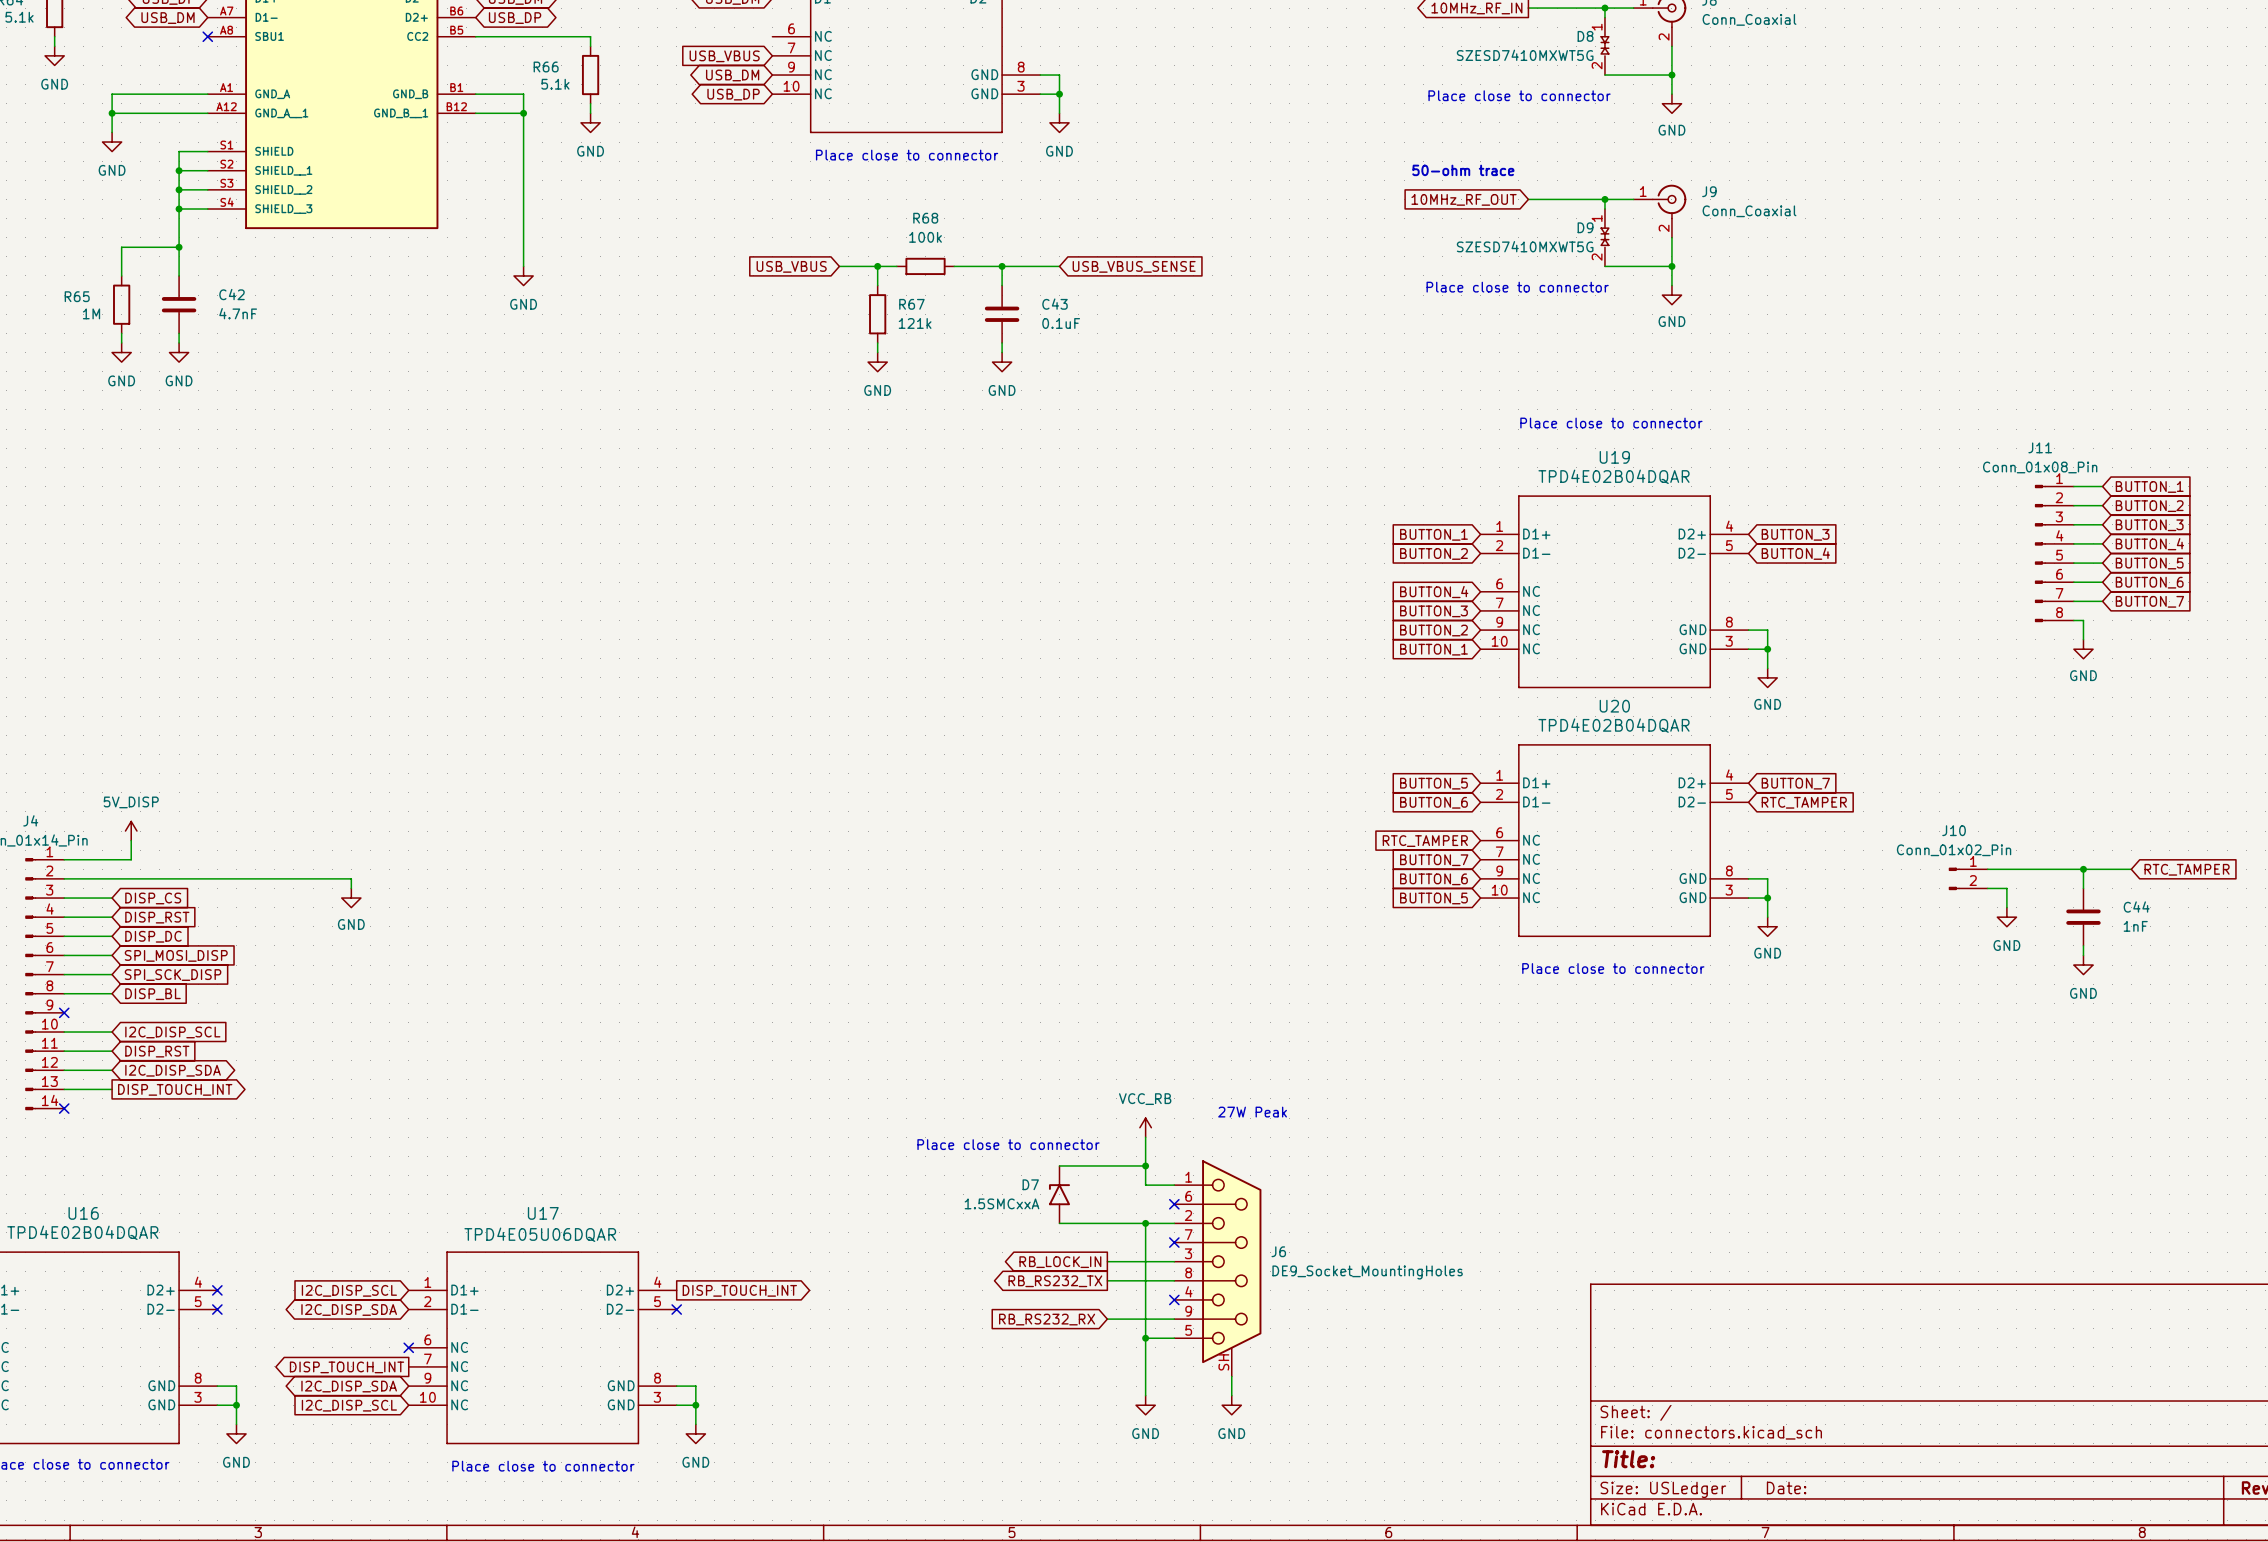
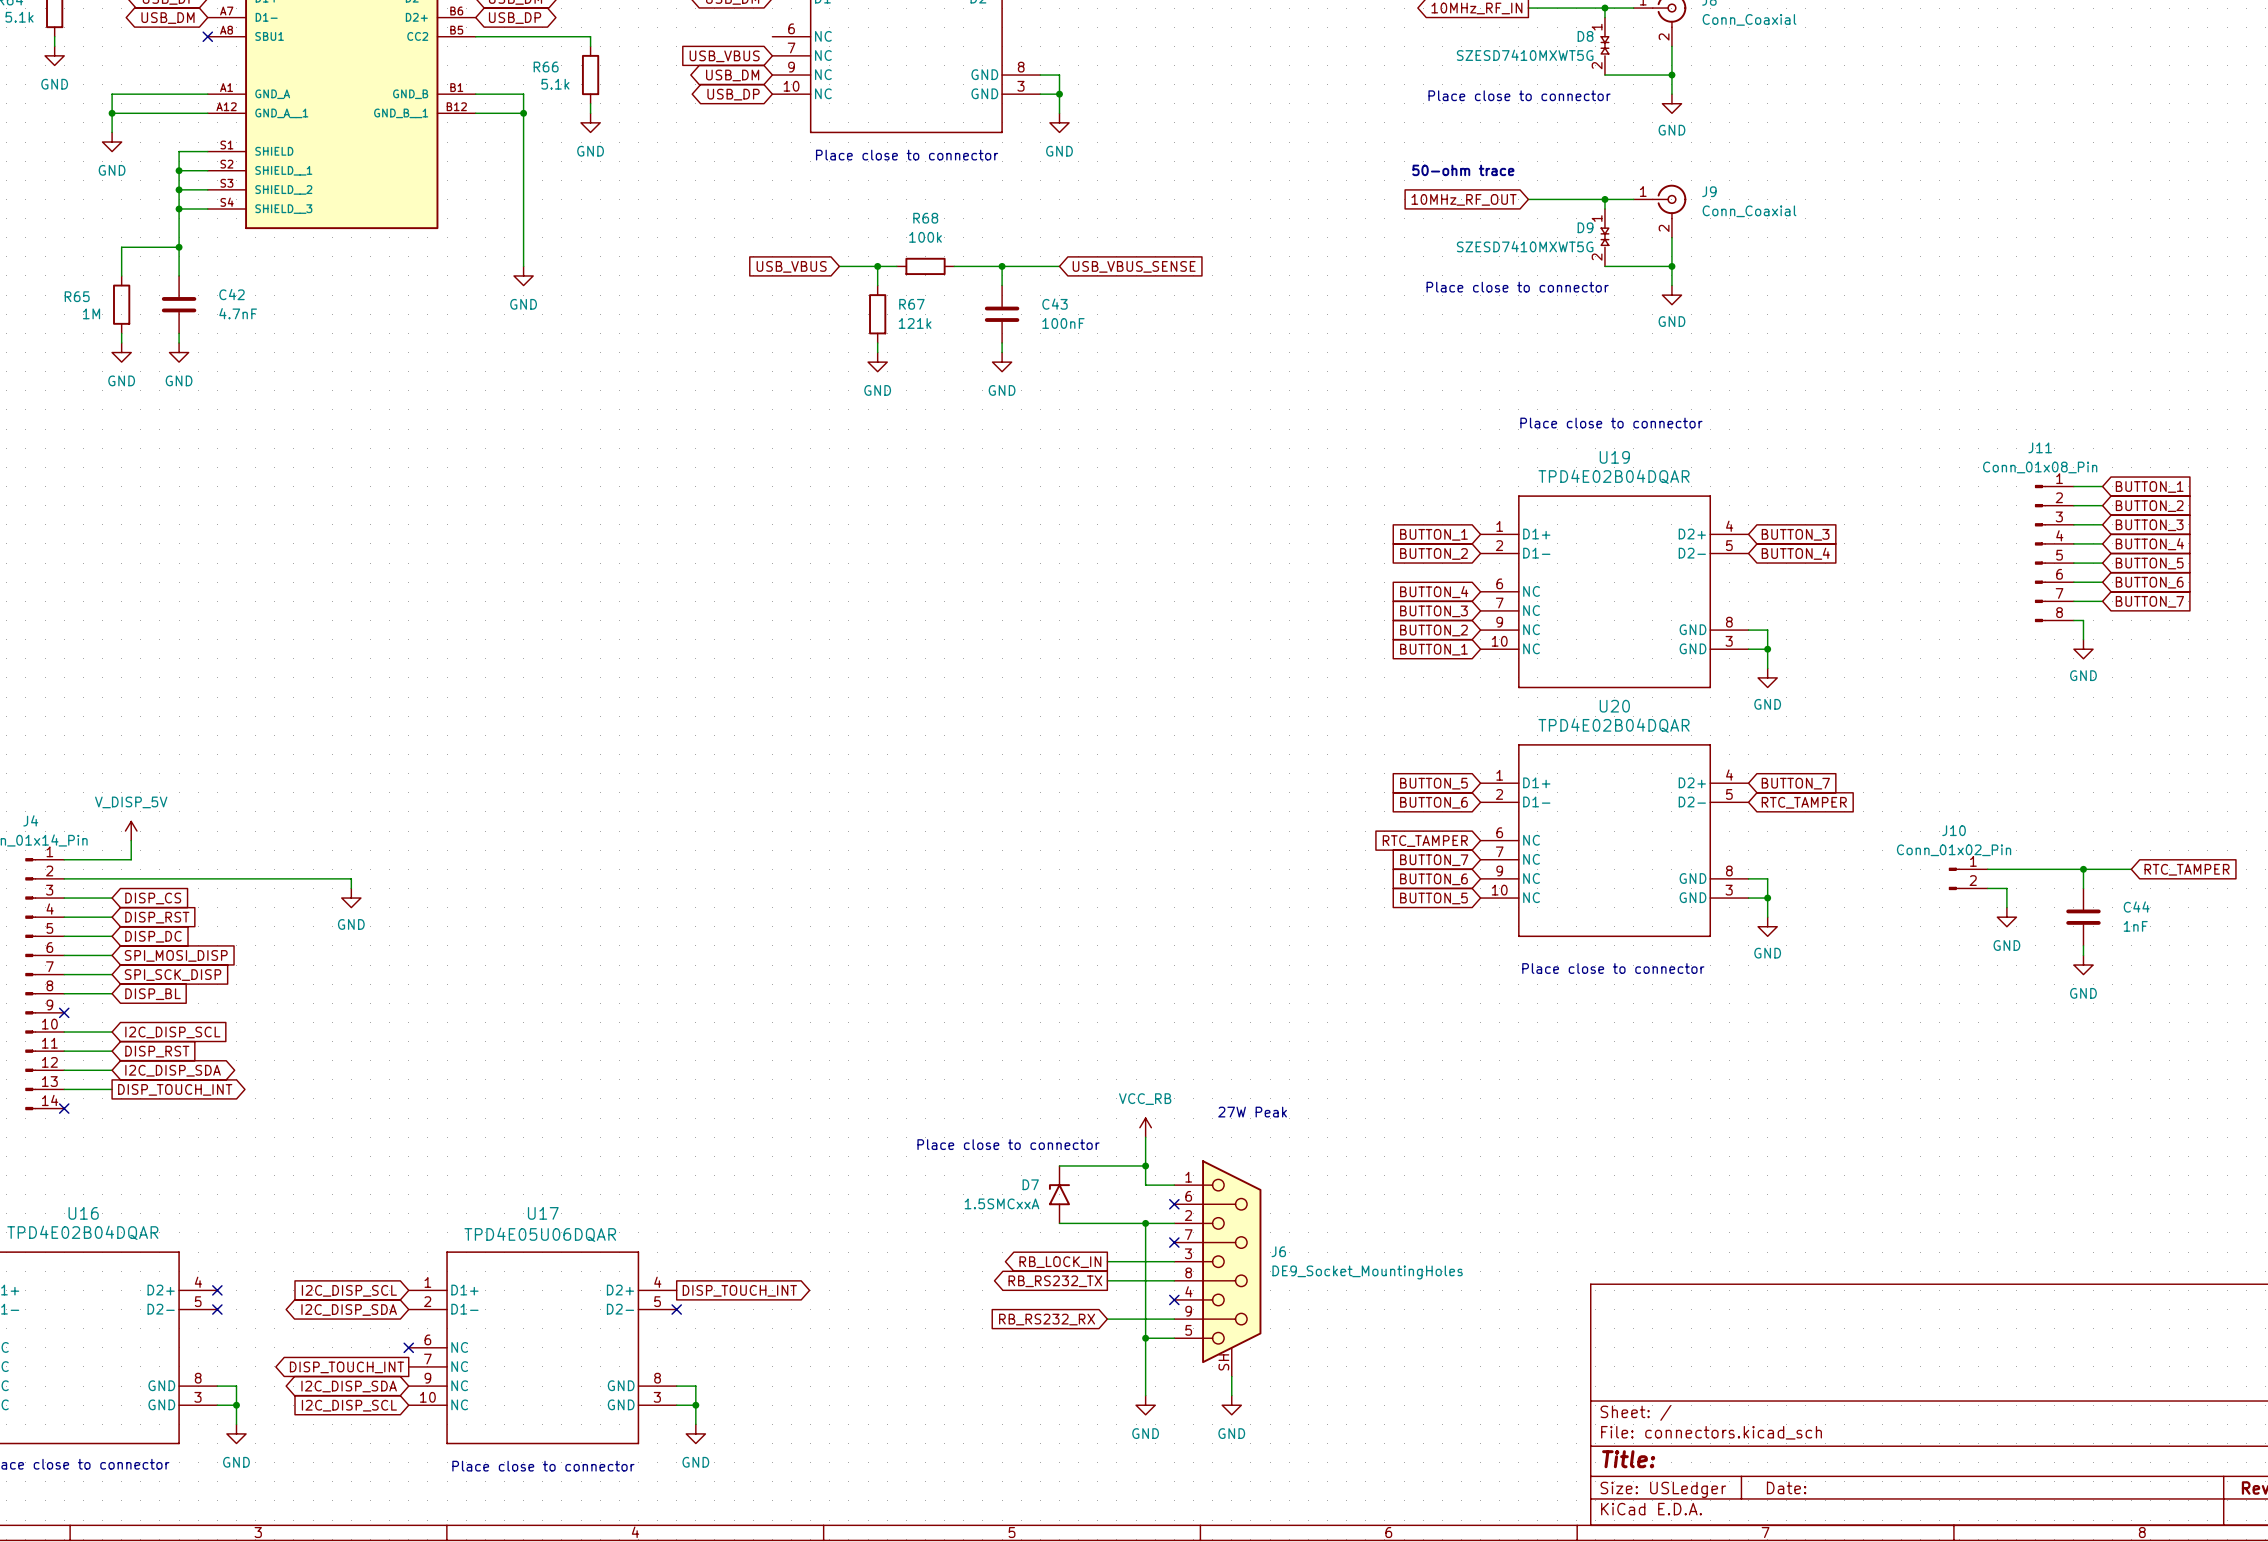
C43 value: 0.1uF (1061, 323) -> 100nF (1063, 323)
power symbol: 5V_DISP (131, 831) -> V_DISP_5V (131, 831)

